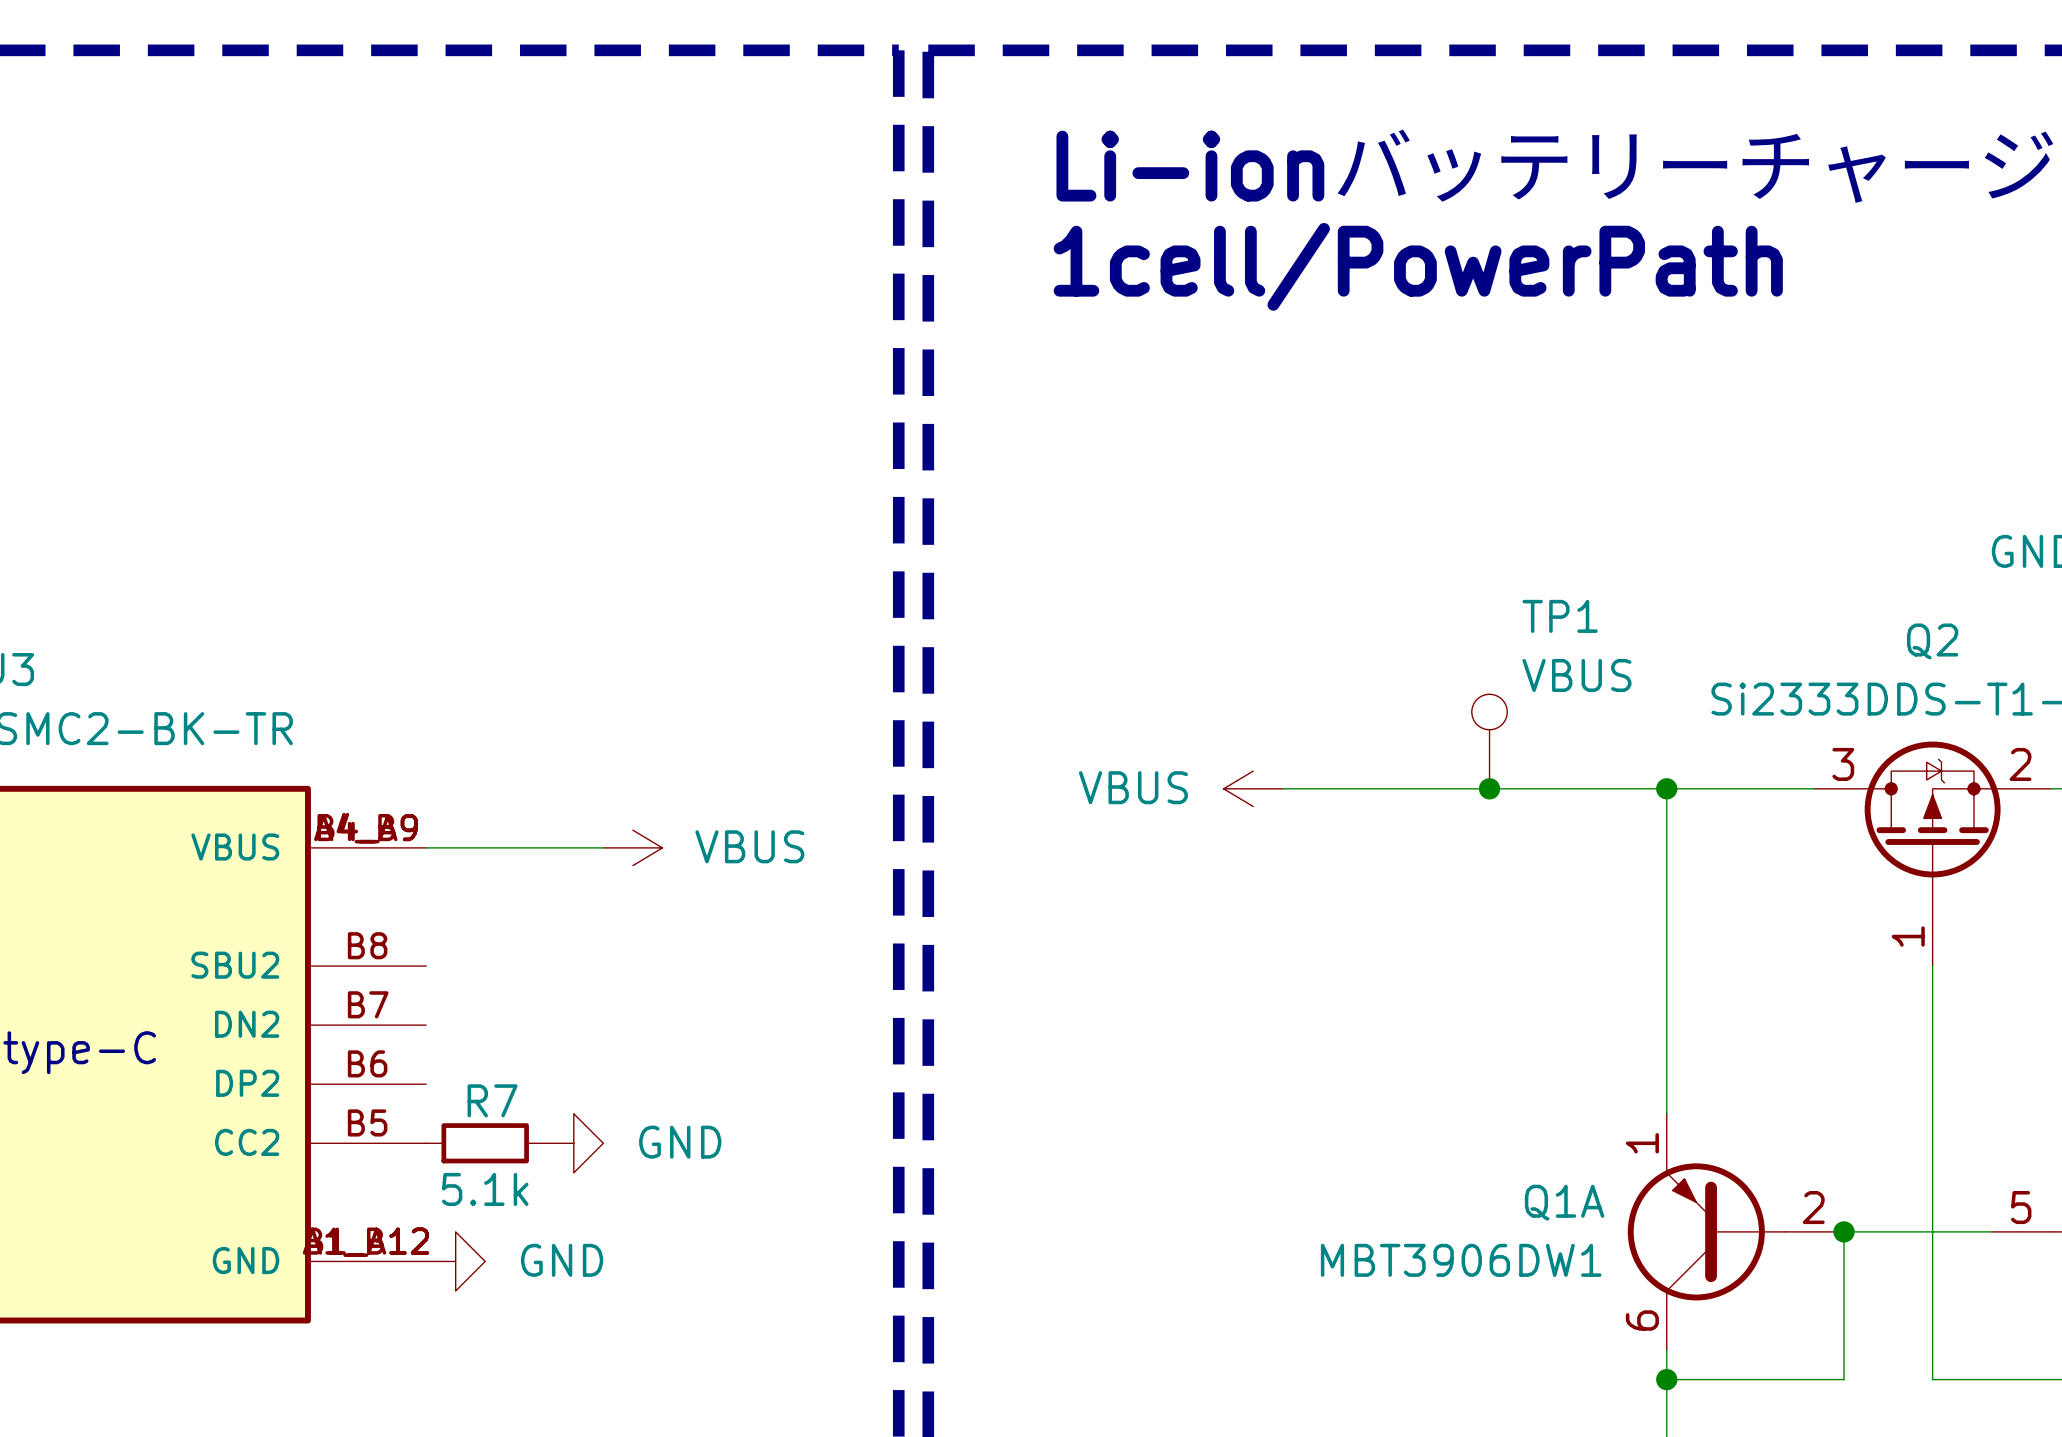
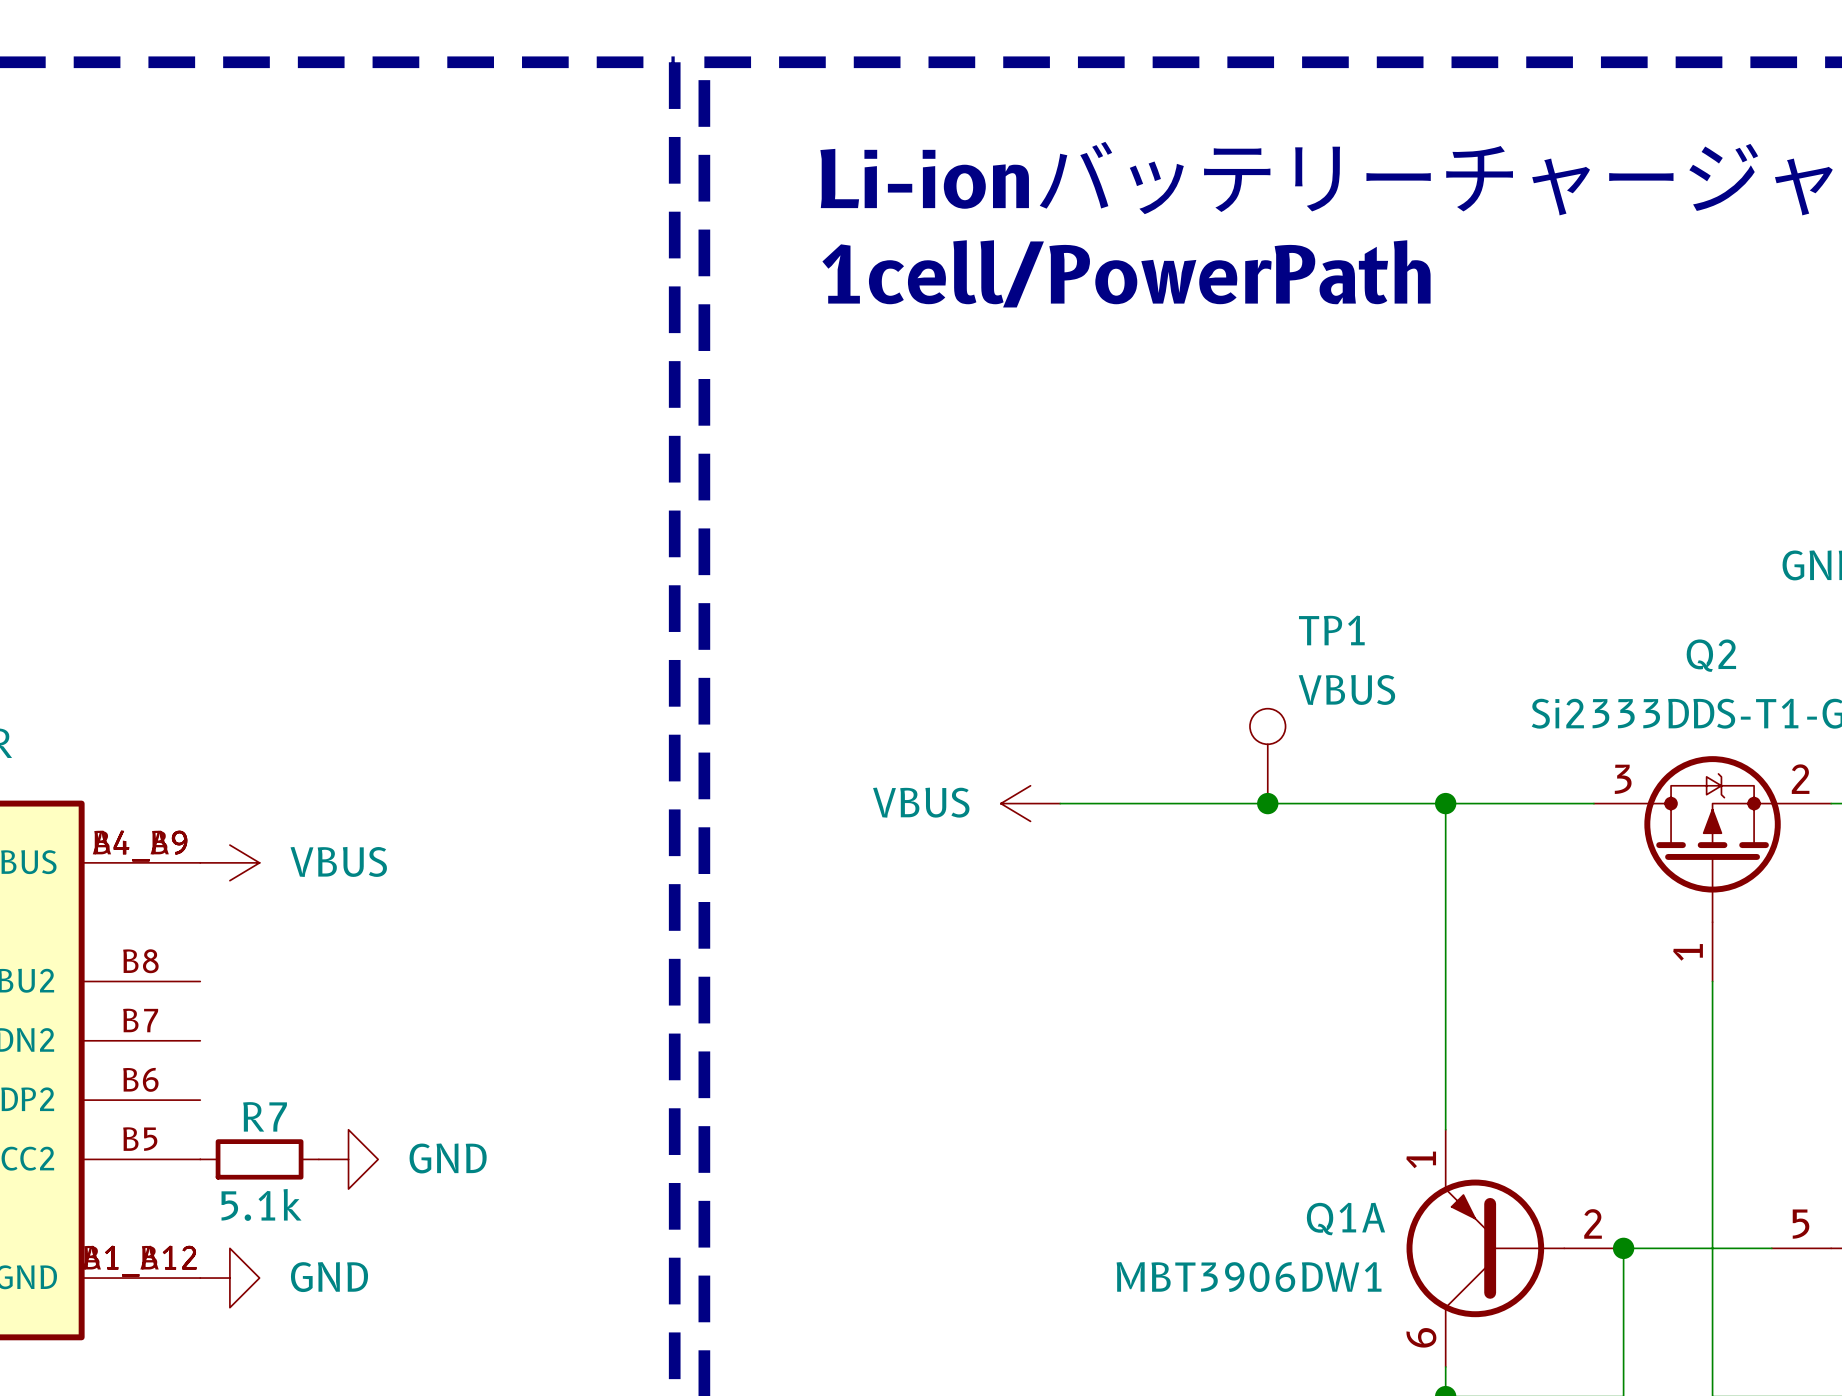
wire: (426, 847) (603, 847) -> none
power symbol position: VBUS (632, 847) -> VBUS (229, 862)

